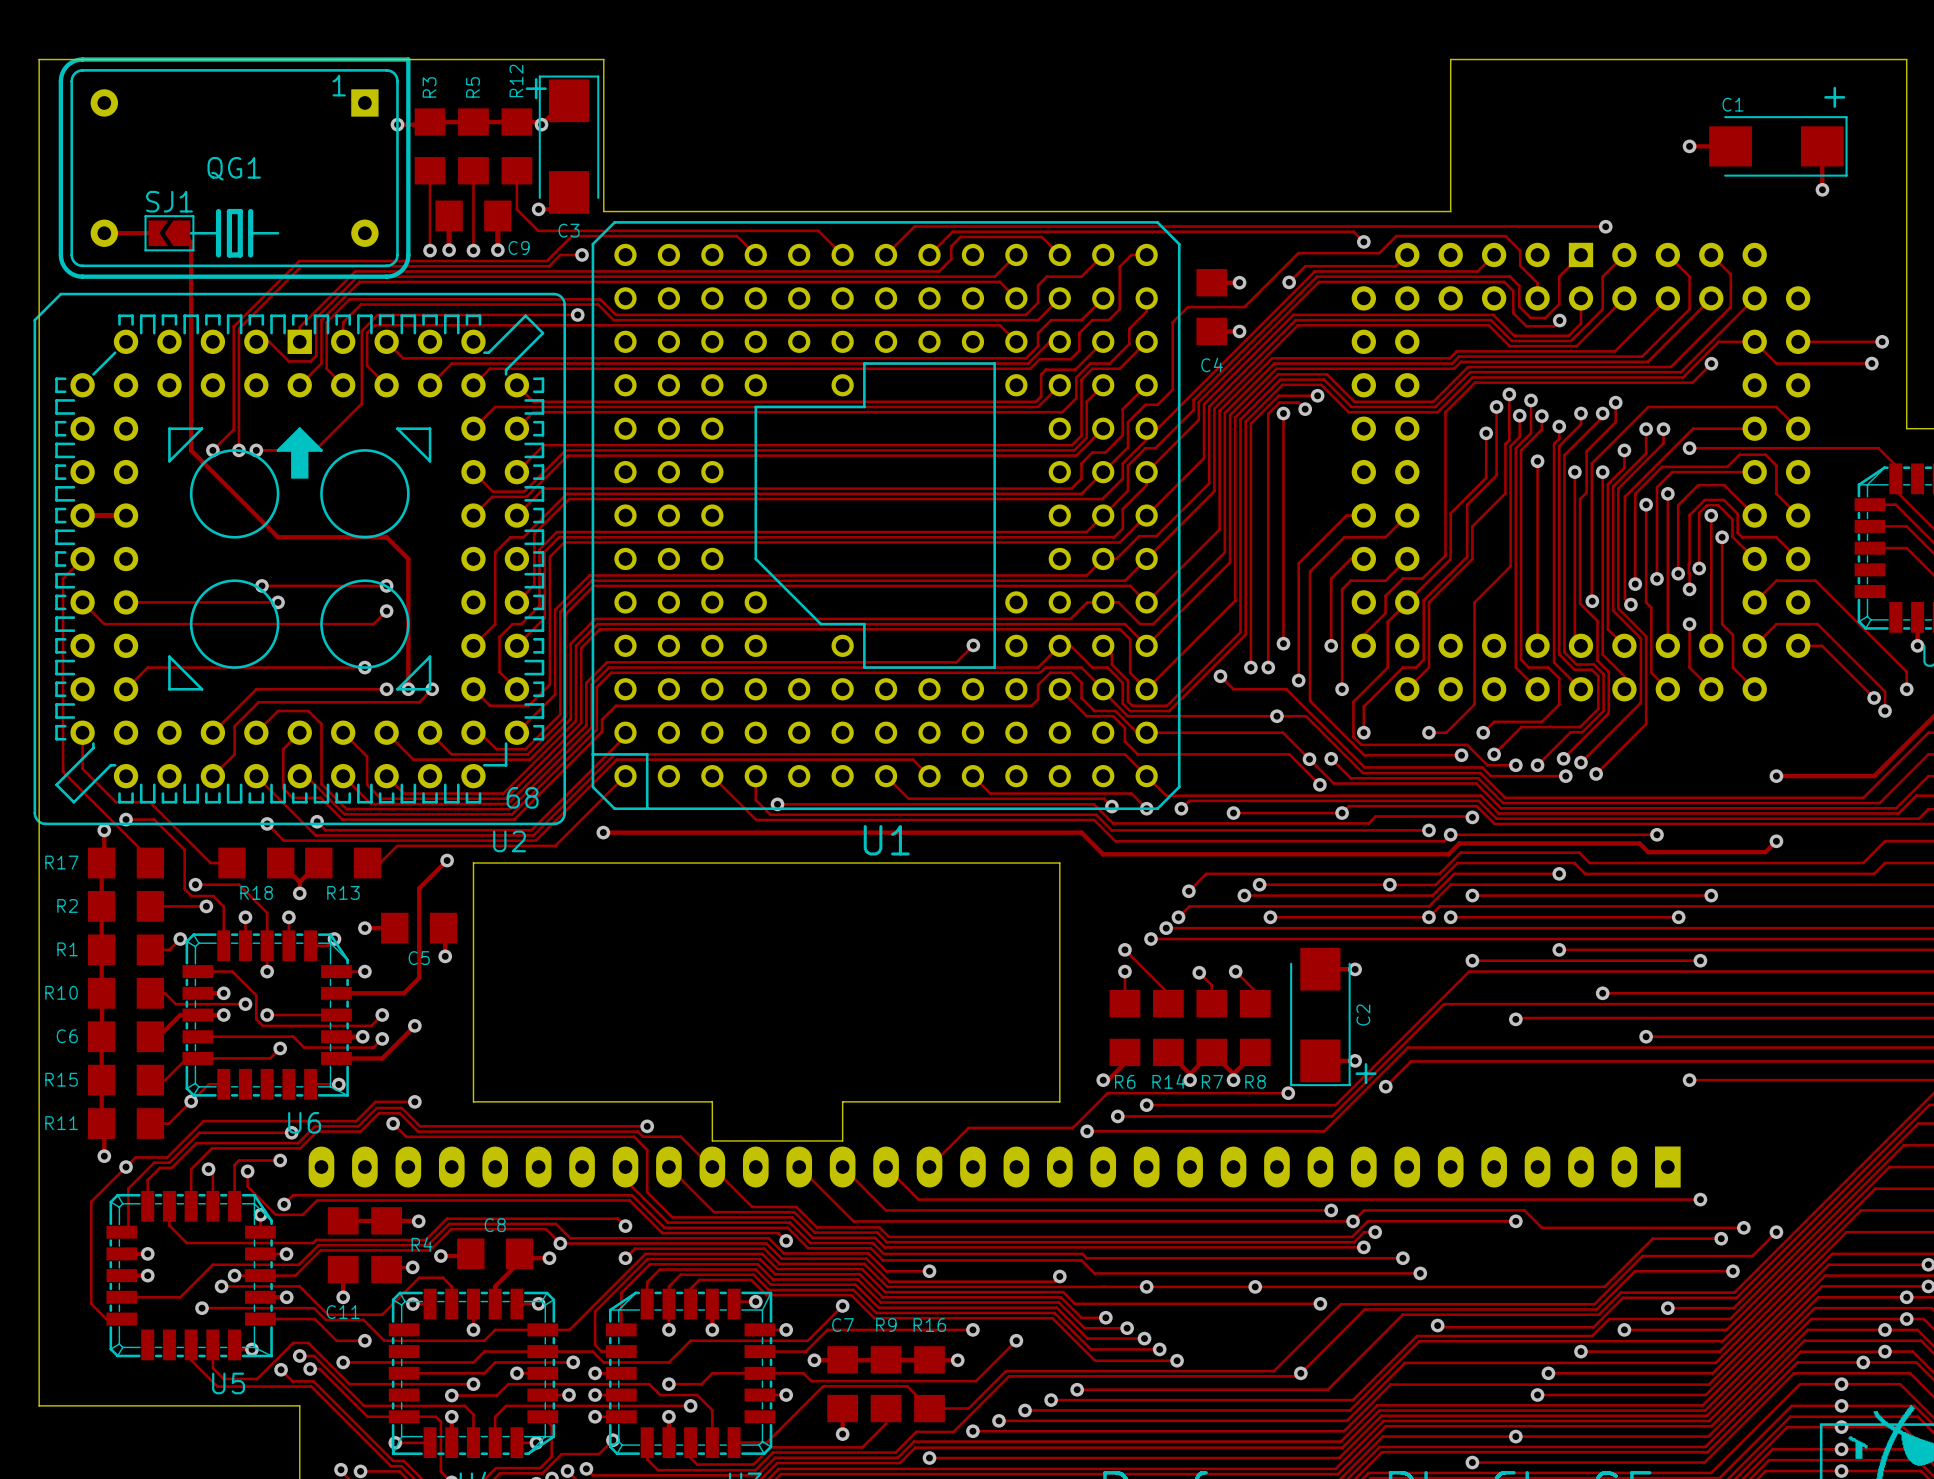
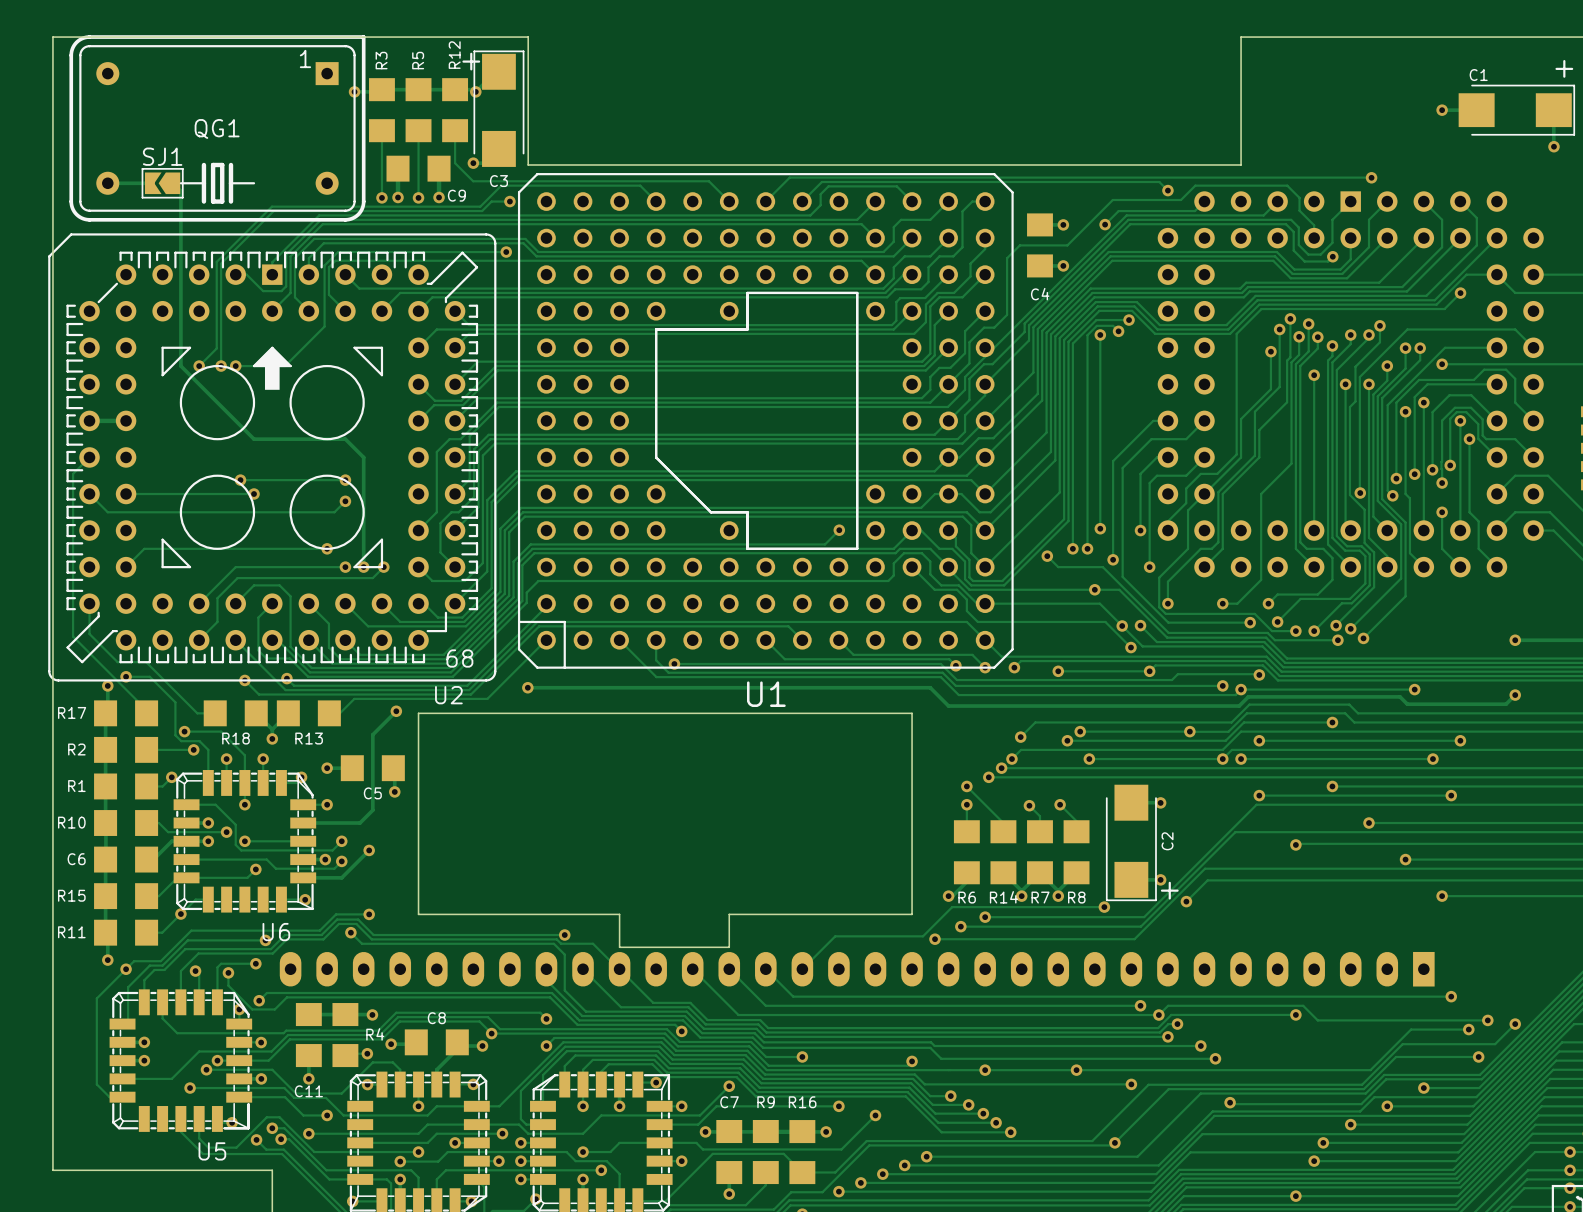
line: none -> (747, 292) (747, 329) (656, 329) (656, 457) (710, 512) (747, 512) (747, 548) (857, 548) (857, 292) (747, 292)
line: none -> (248, 1104) (248, 1128) (224, 1128)

